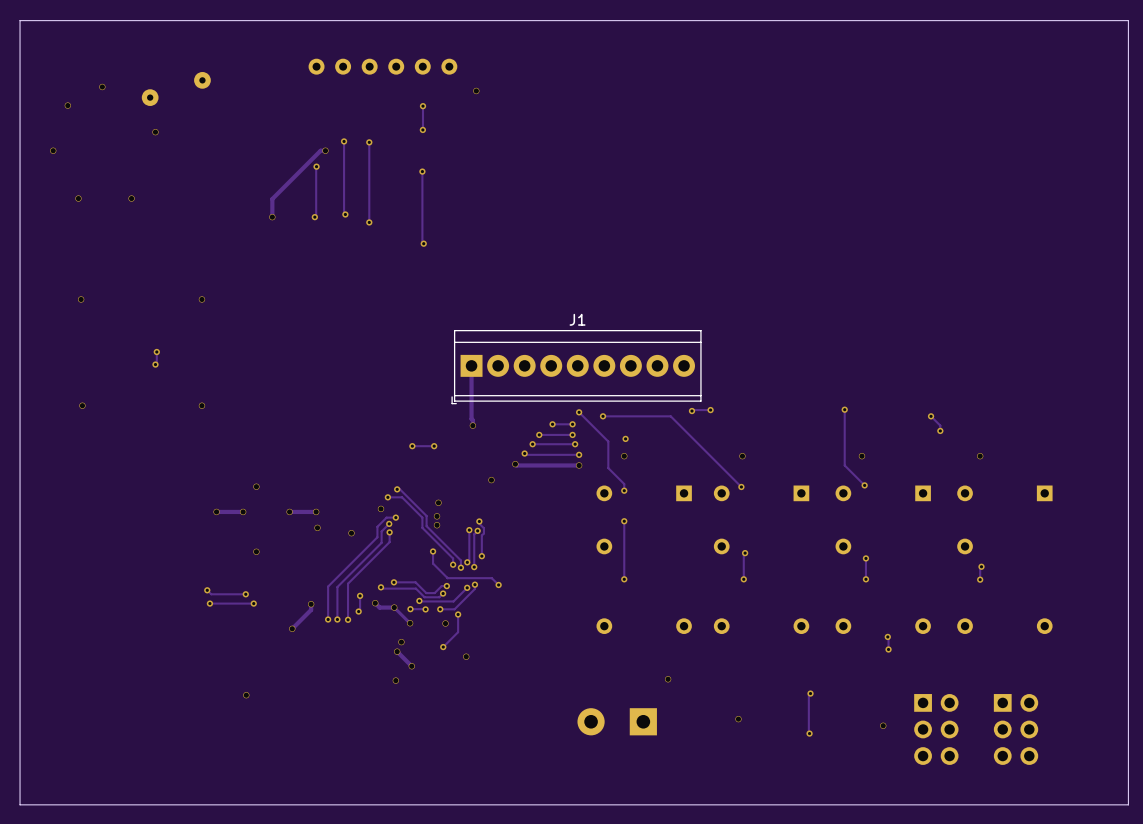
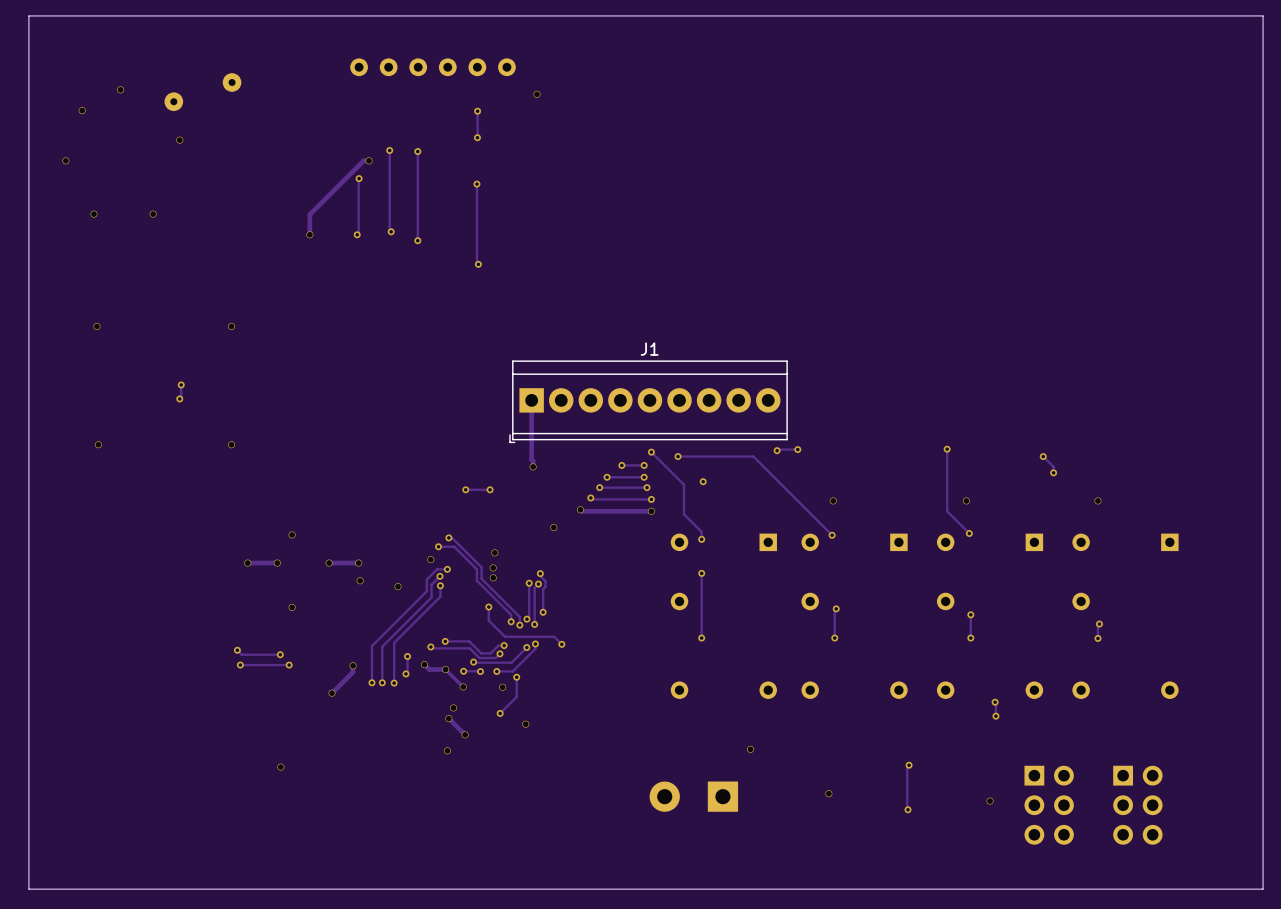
via: (624, 456) -> none

